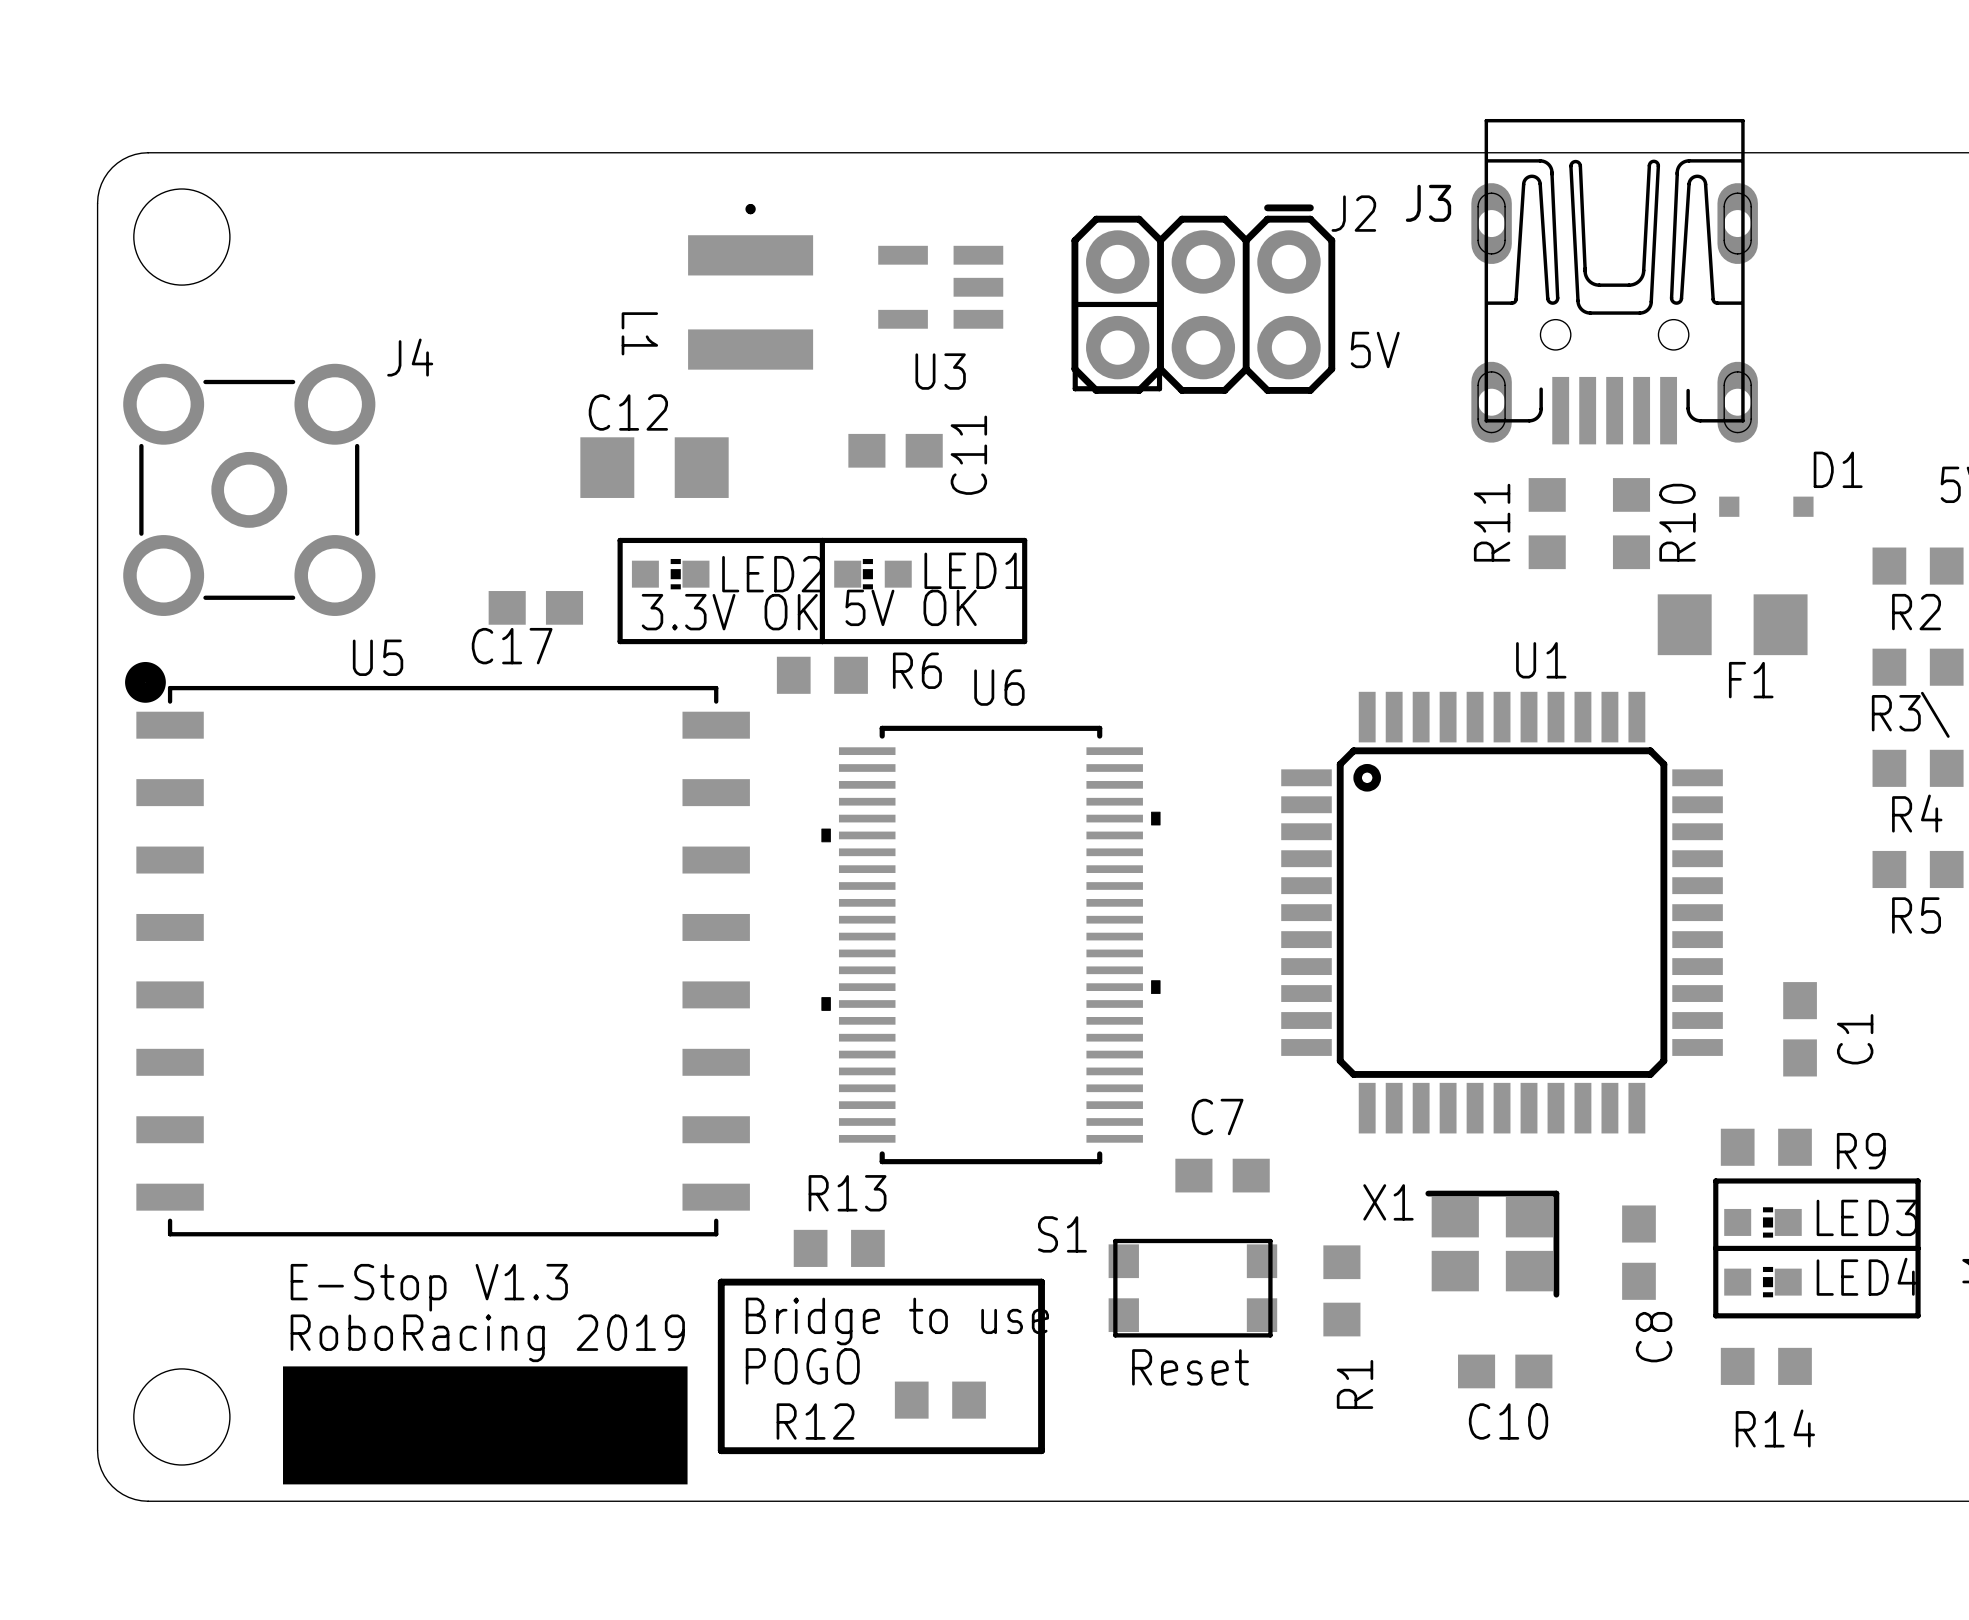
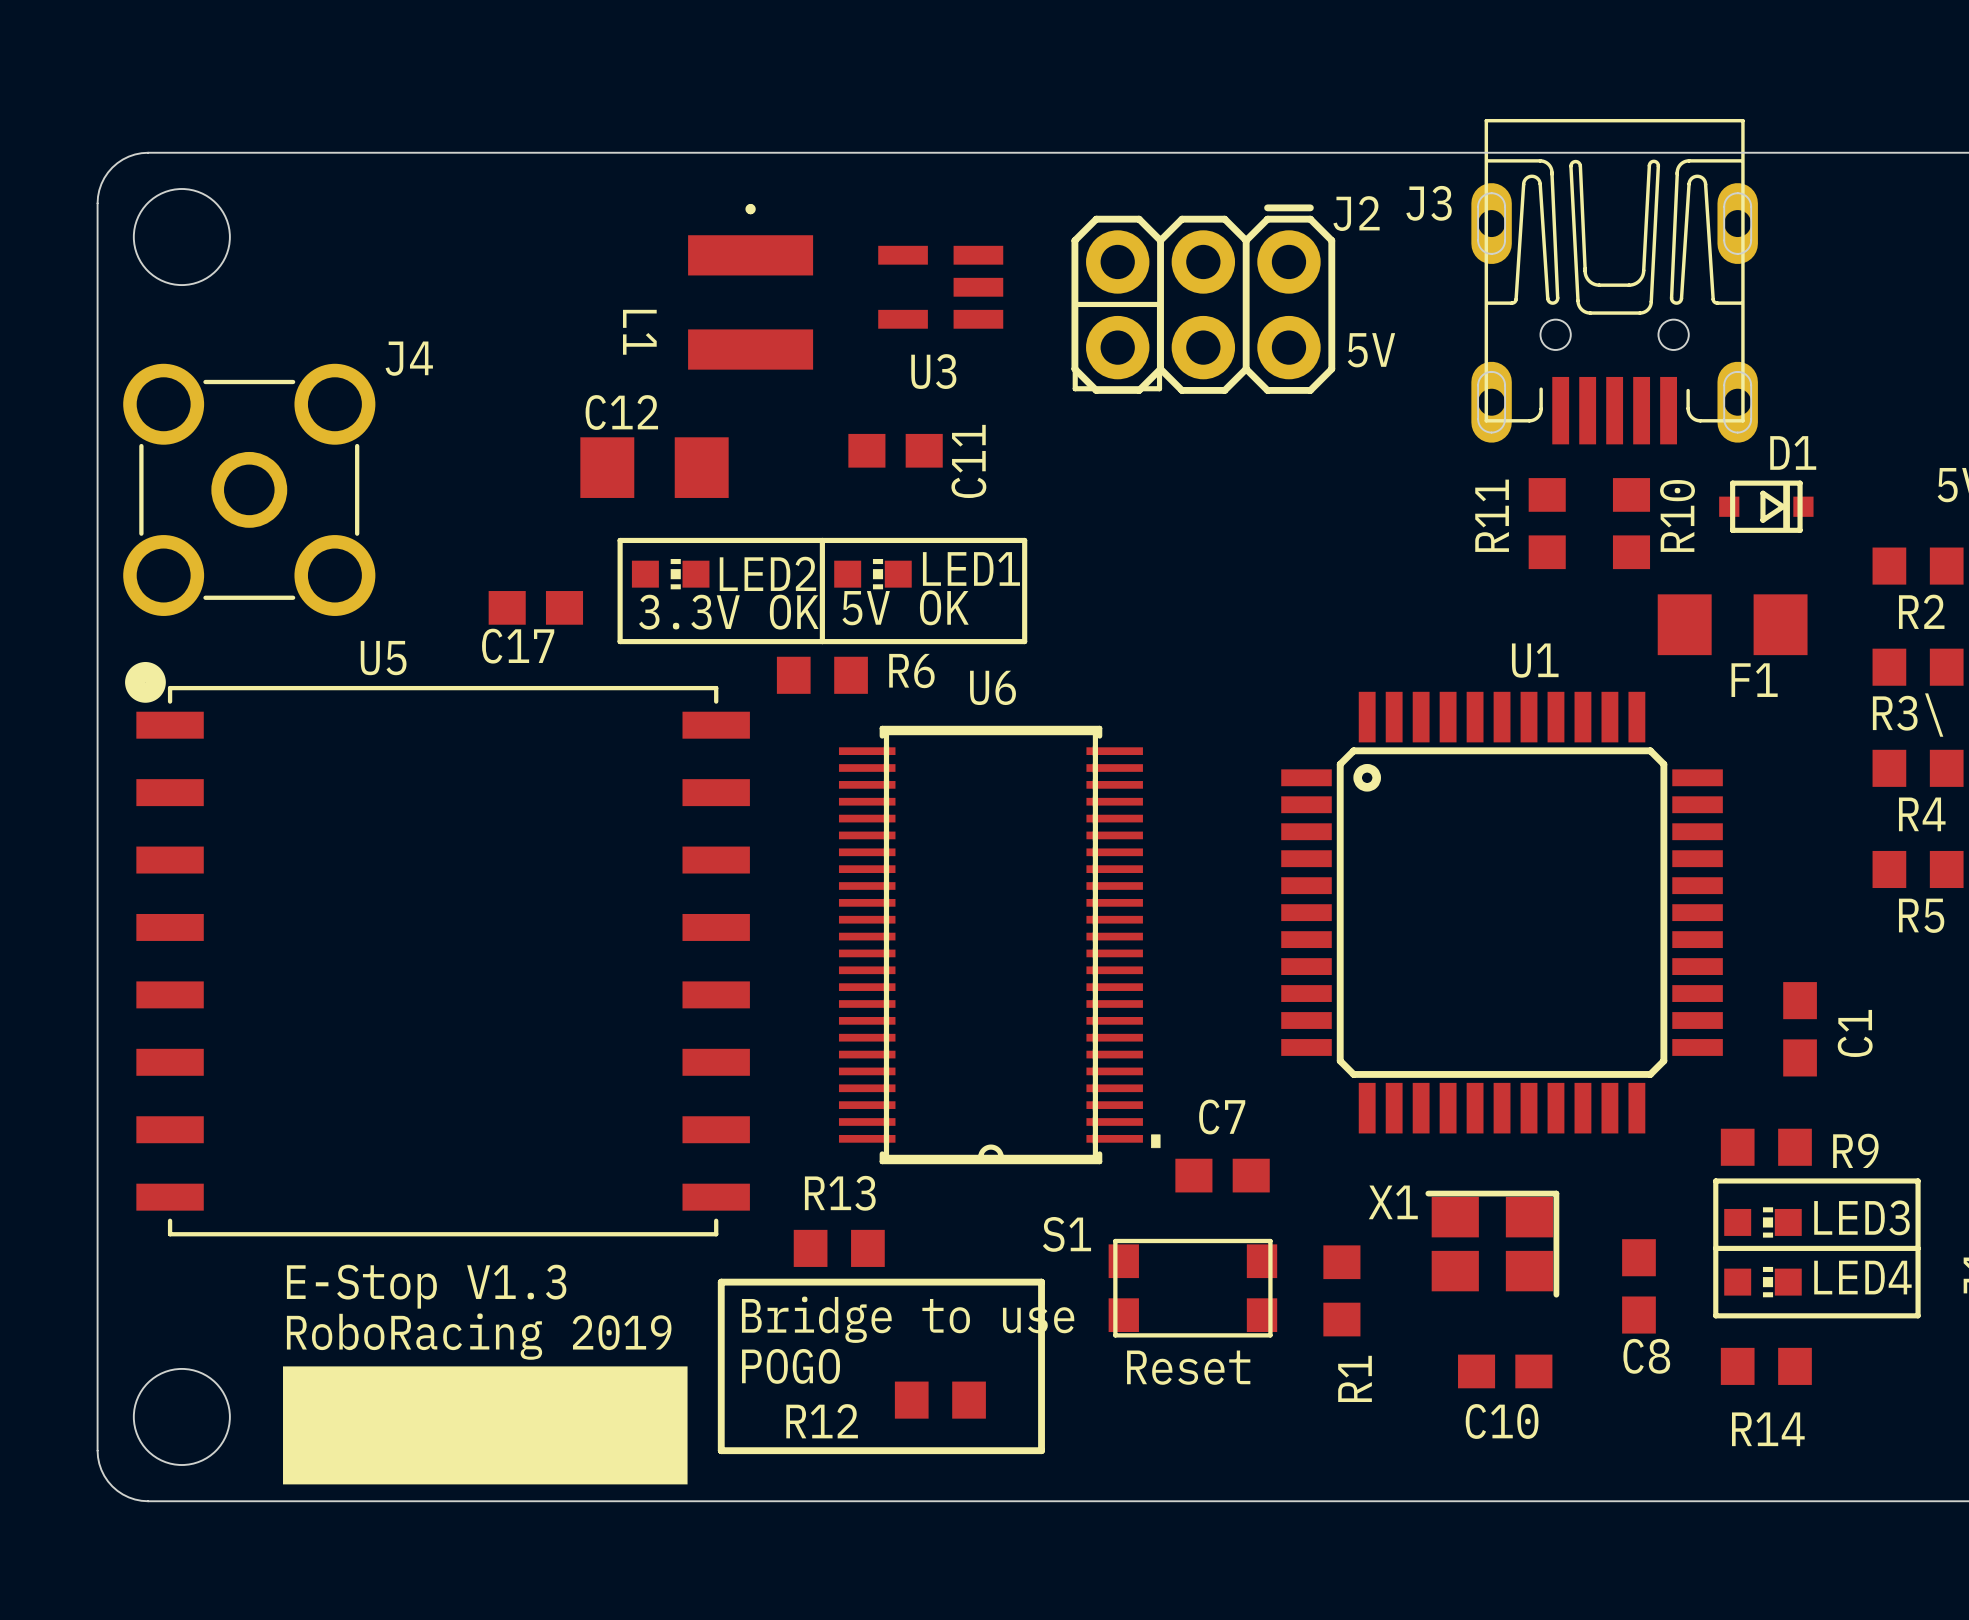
D1 footprint: [1719, 496, 1814, 517] -> [1719, 480, 1814, 533]
LED1 rotation: 0° (872, 574) -> 180° (872, 574)
U6 footprint: [821, 725, 1161, 1165] -> [838, 725, 1161, 1165]
C8 position: (1638, 1252) -> (1638, 1286)
C8 name rotation: 0° (1654, 1337) -> 90° clockwise (1646, 1356)

